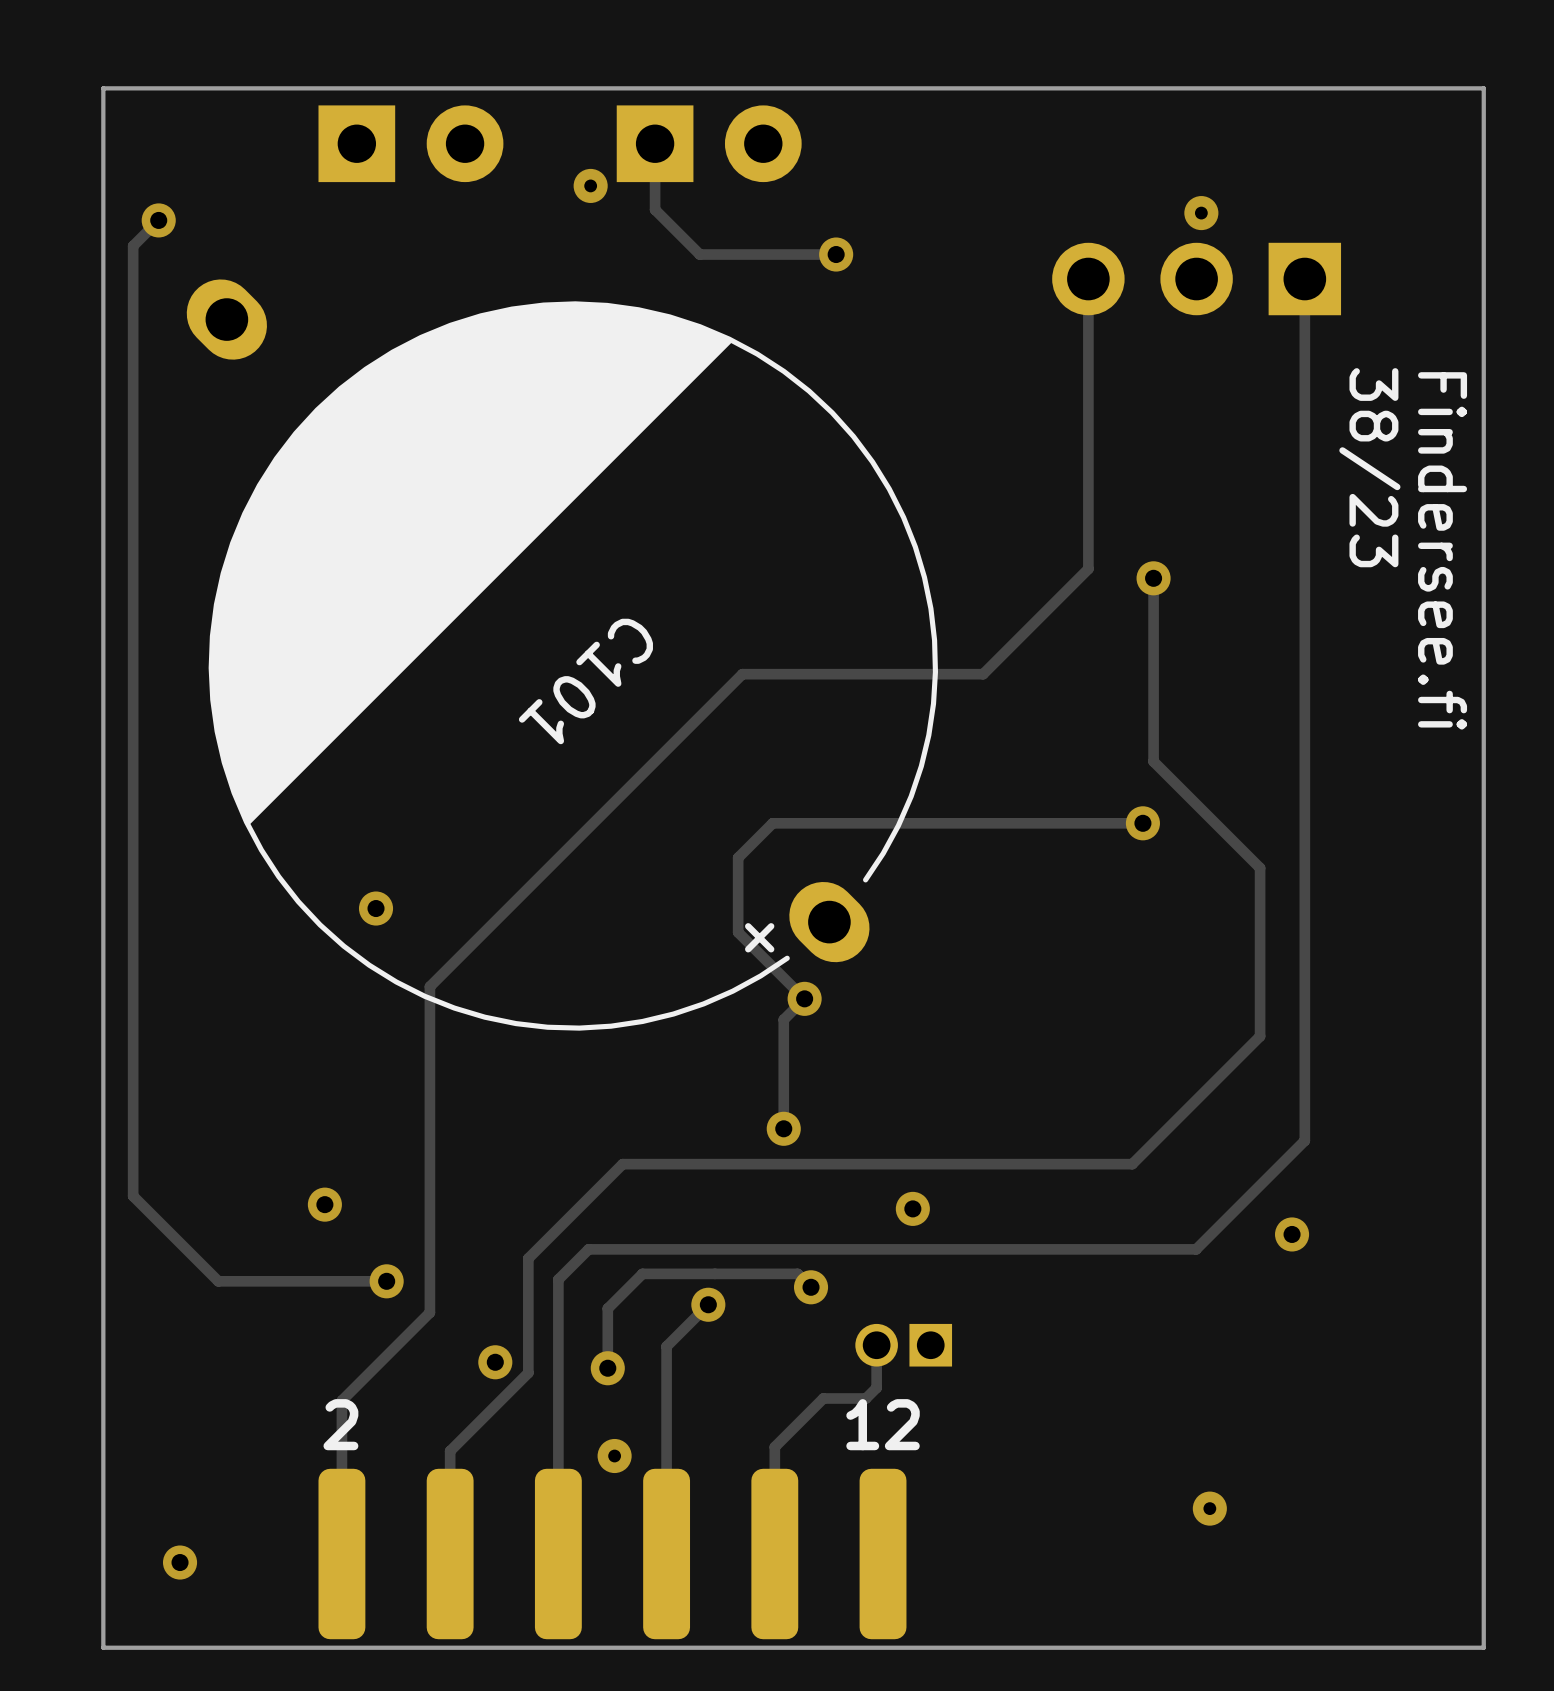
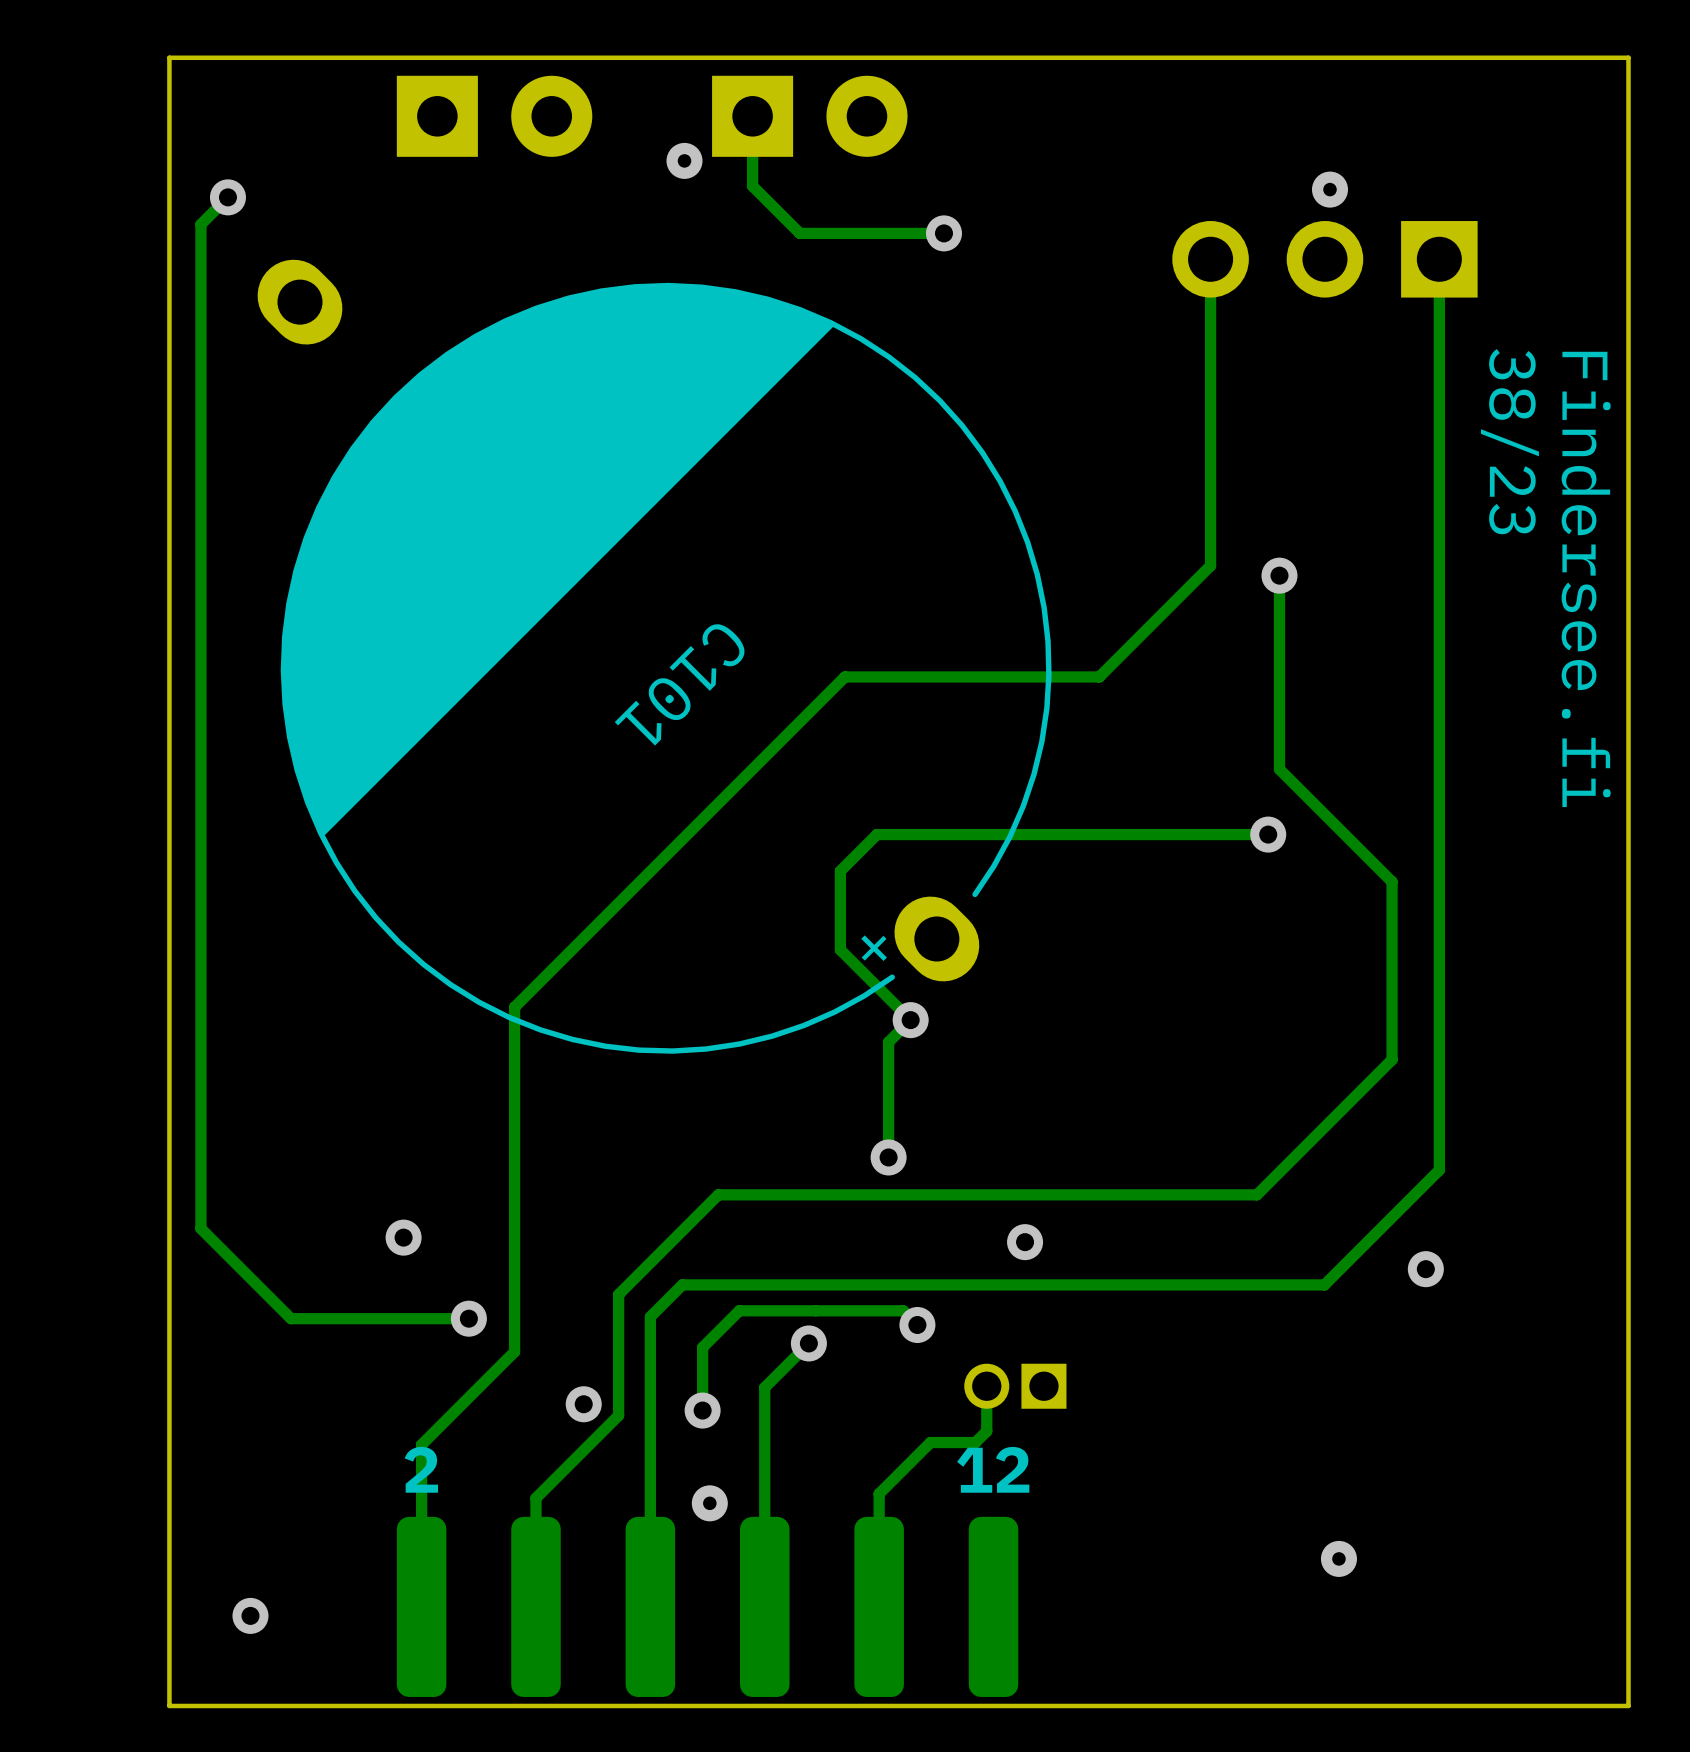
via: (376, 908) -> none

